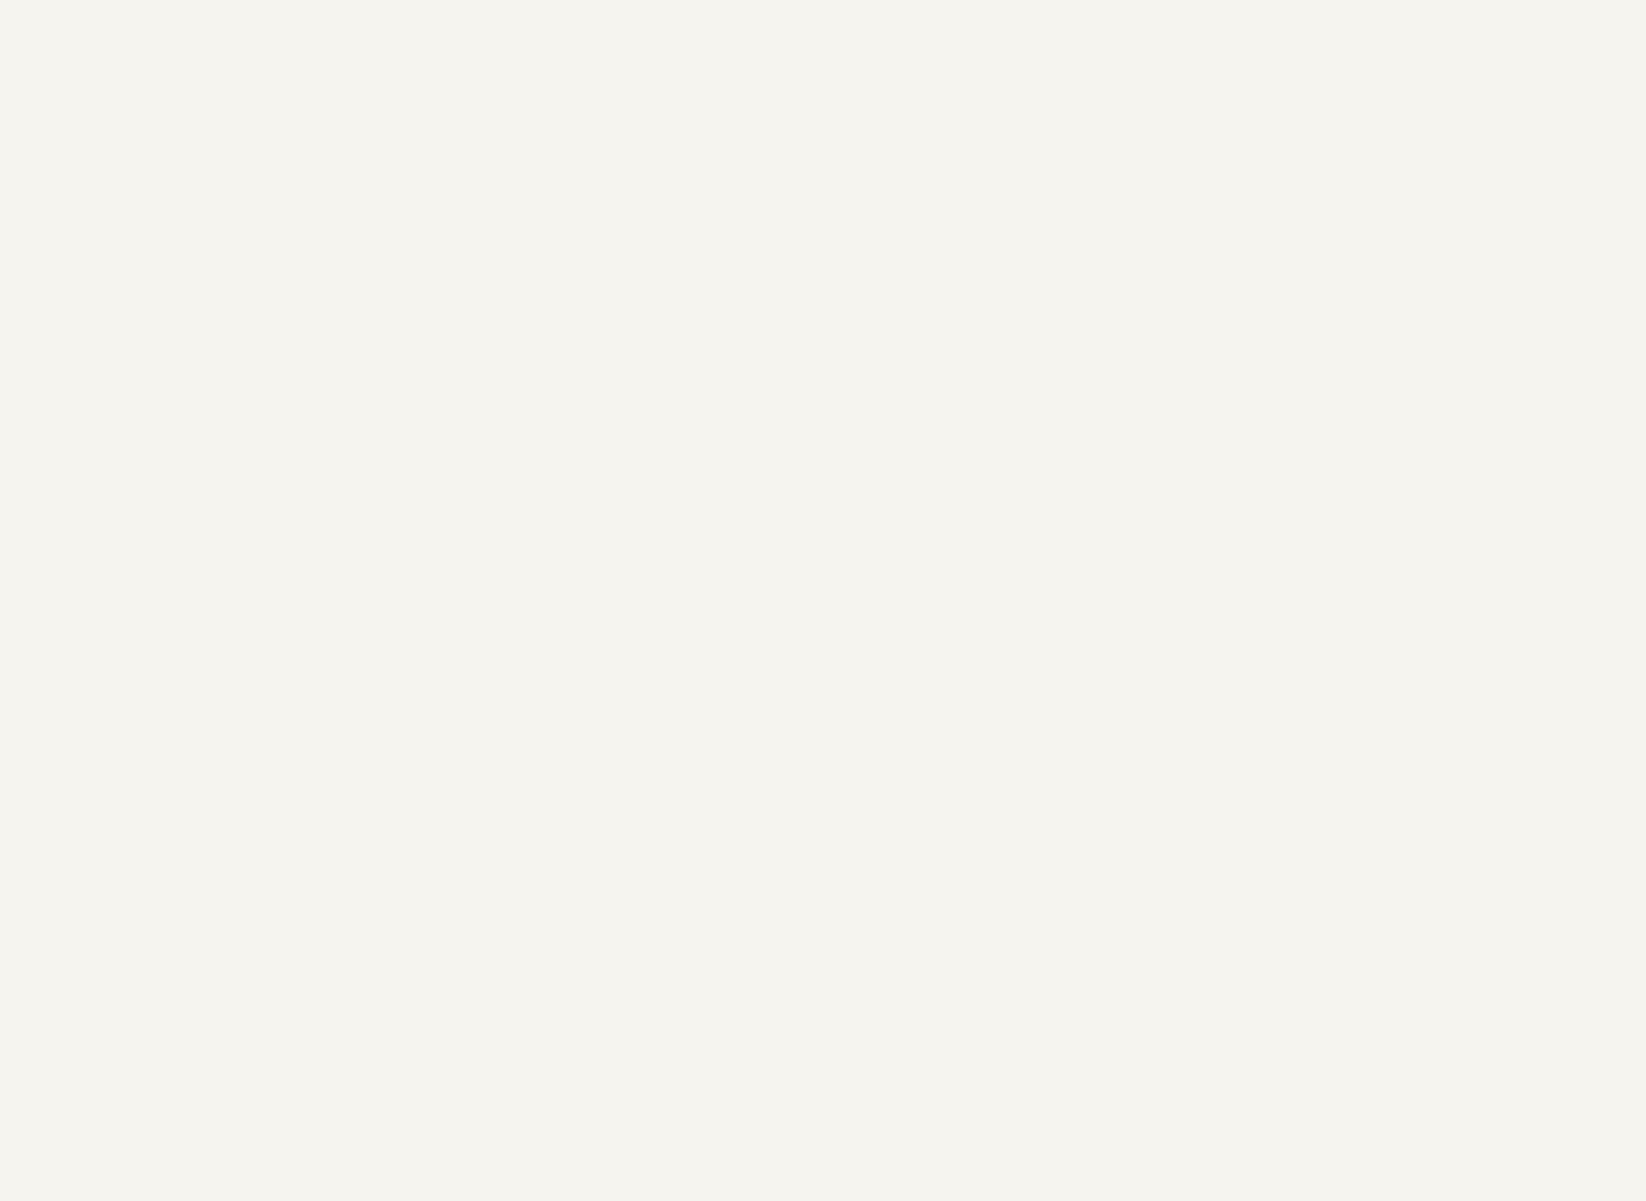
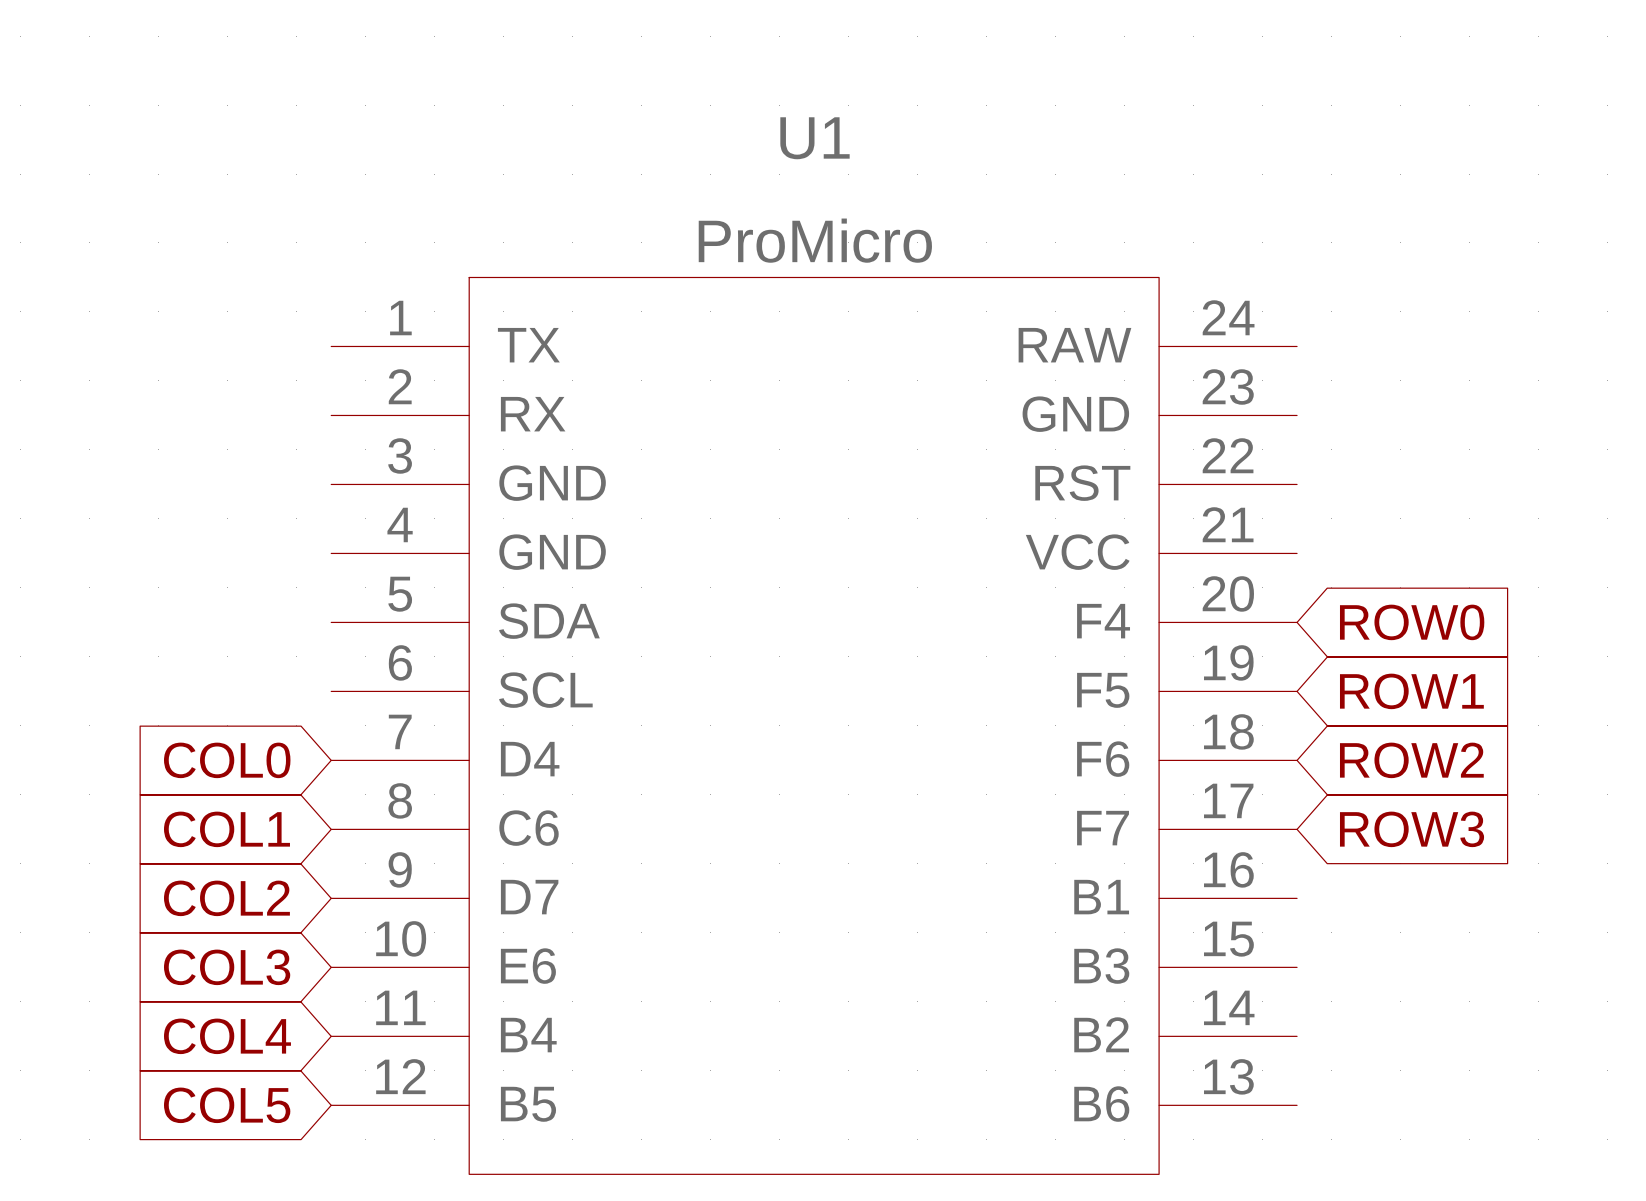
global label: none -> ROW0 (1412, 622)
global label: none -> ROW1 (1411, 691)
U1: none -> ProMicro (814, 725)
global label: none -> COL0 (227, 760)
global label: none -> ROW2 (1411, 760)
global label: none -> COL1 (226, 829)
global label: none -> ROW3 (1412, 829)
global label: none -> COL2 (226, 898)
global label: none -> COL3 (227, 967)
global label: none -> COL4 (227, 1036)
global label: none -> COL5 (227, 1105)

